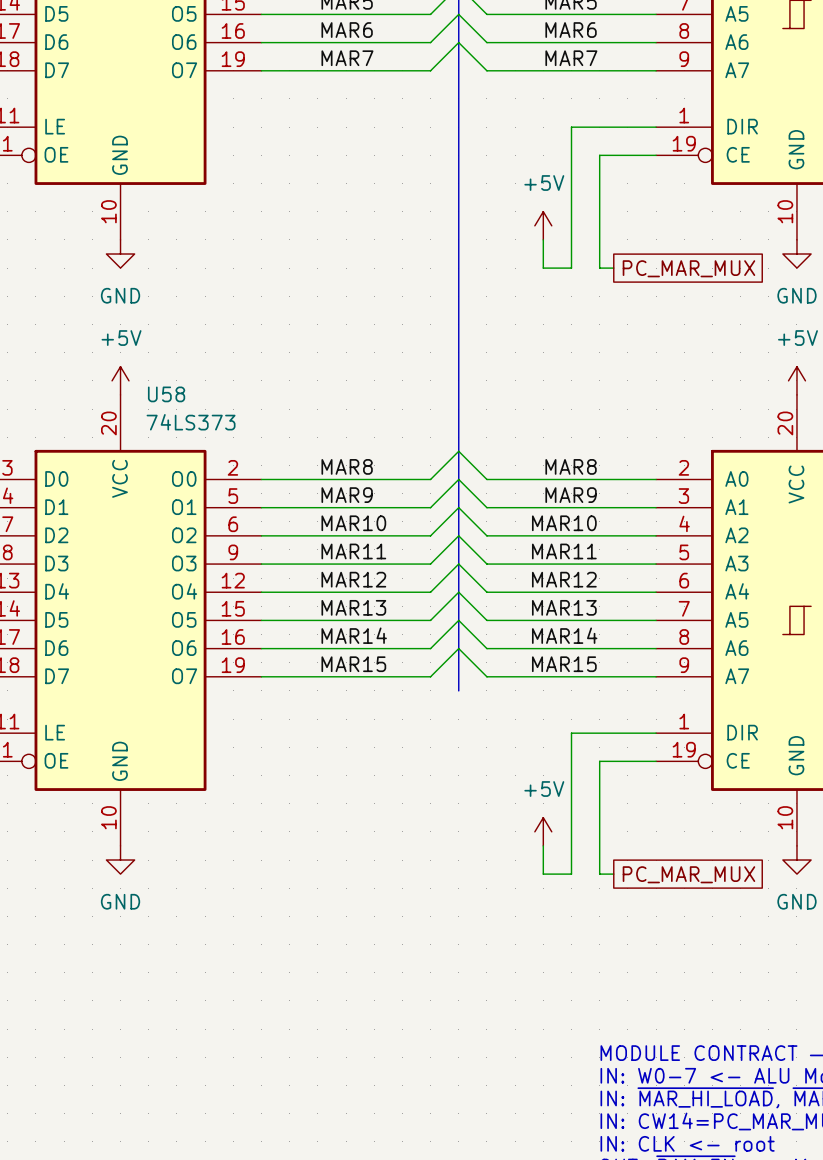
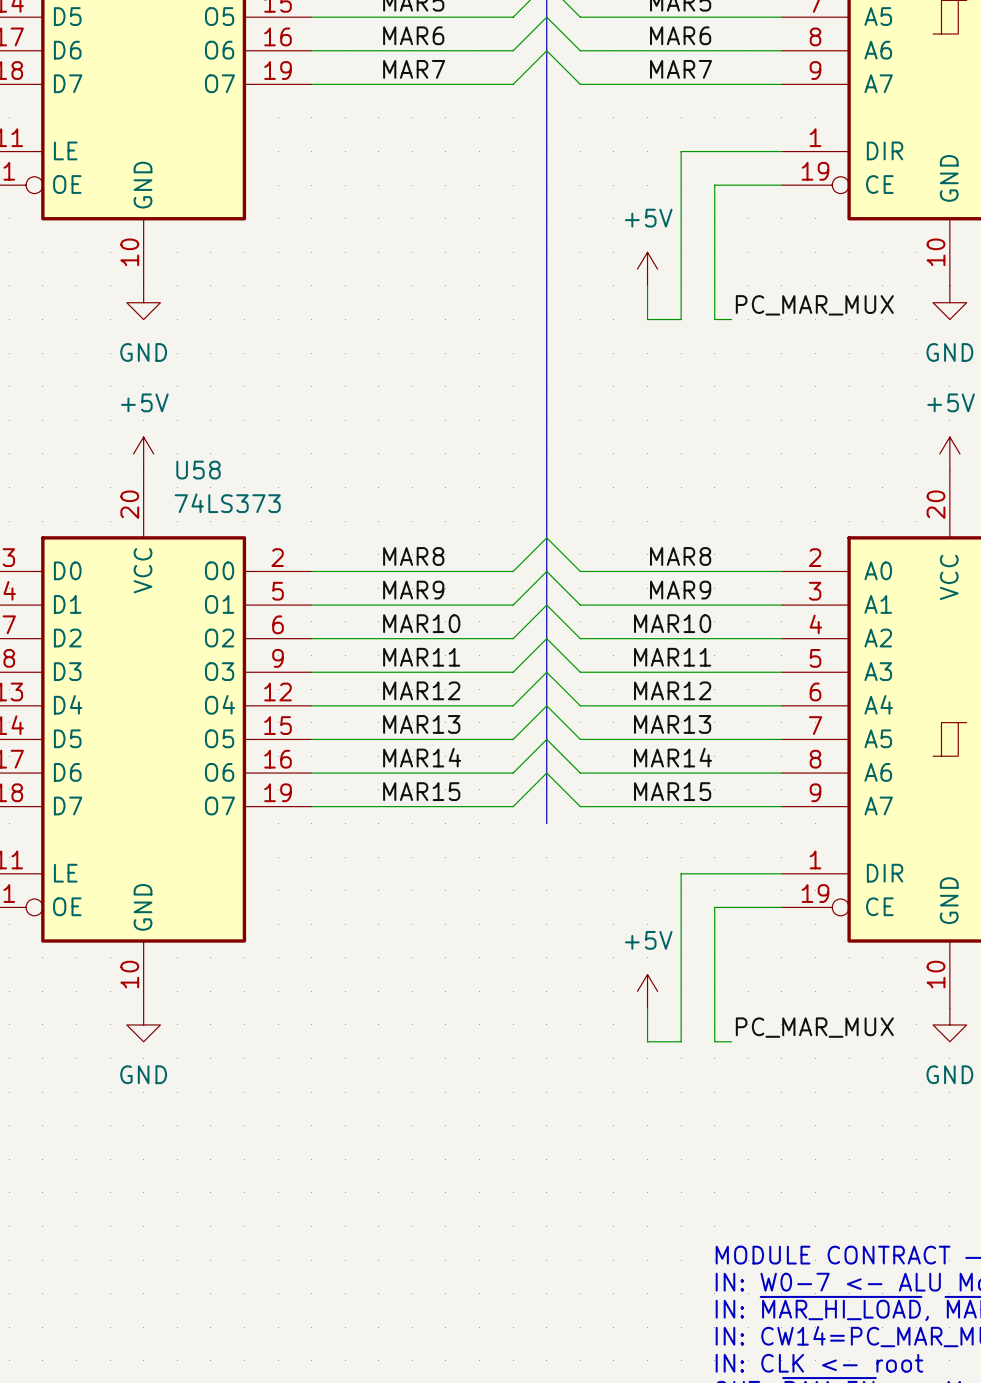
label: none -> PC_MAR_MUX (814, 305)
global label: PC_MAR_MUX (688, 268) -> none
label: none -> PC_MAR_MUX (814, 1027)
global label: PC_MAR_MUX (688, 874) -> none

